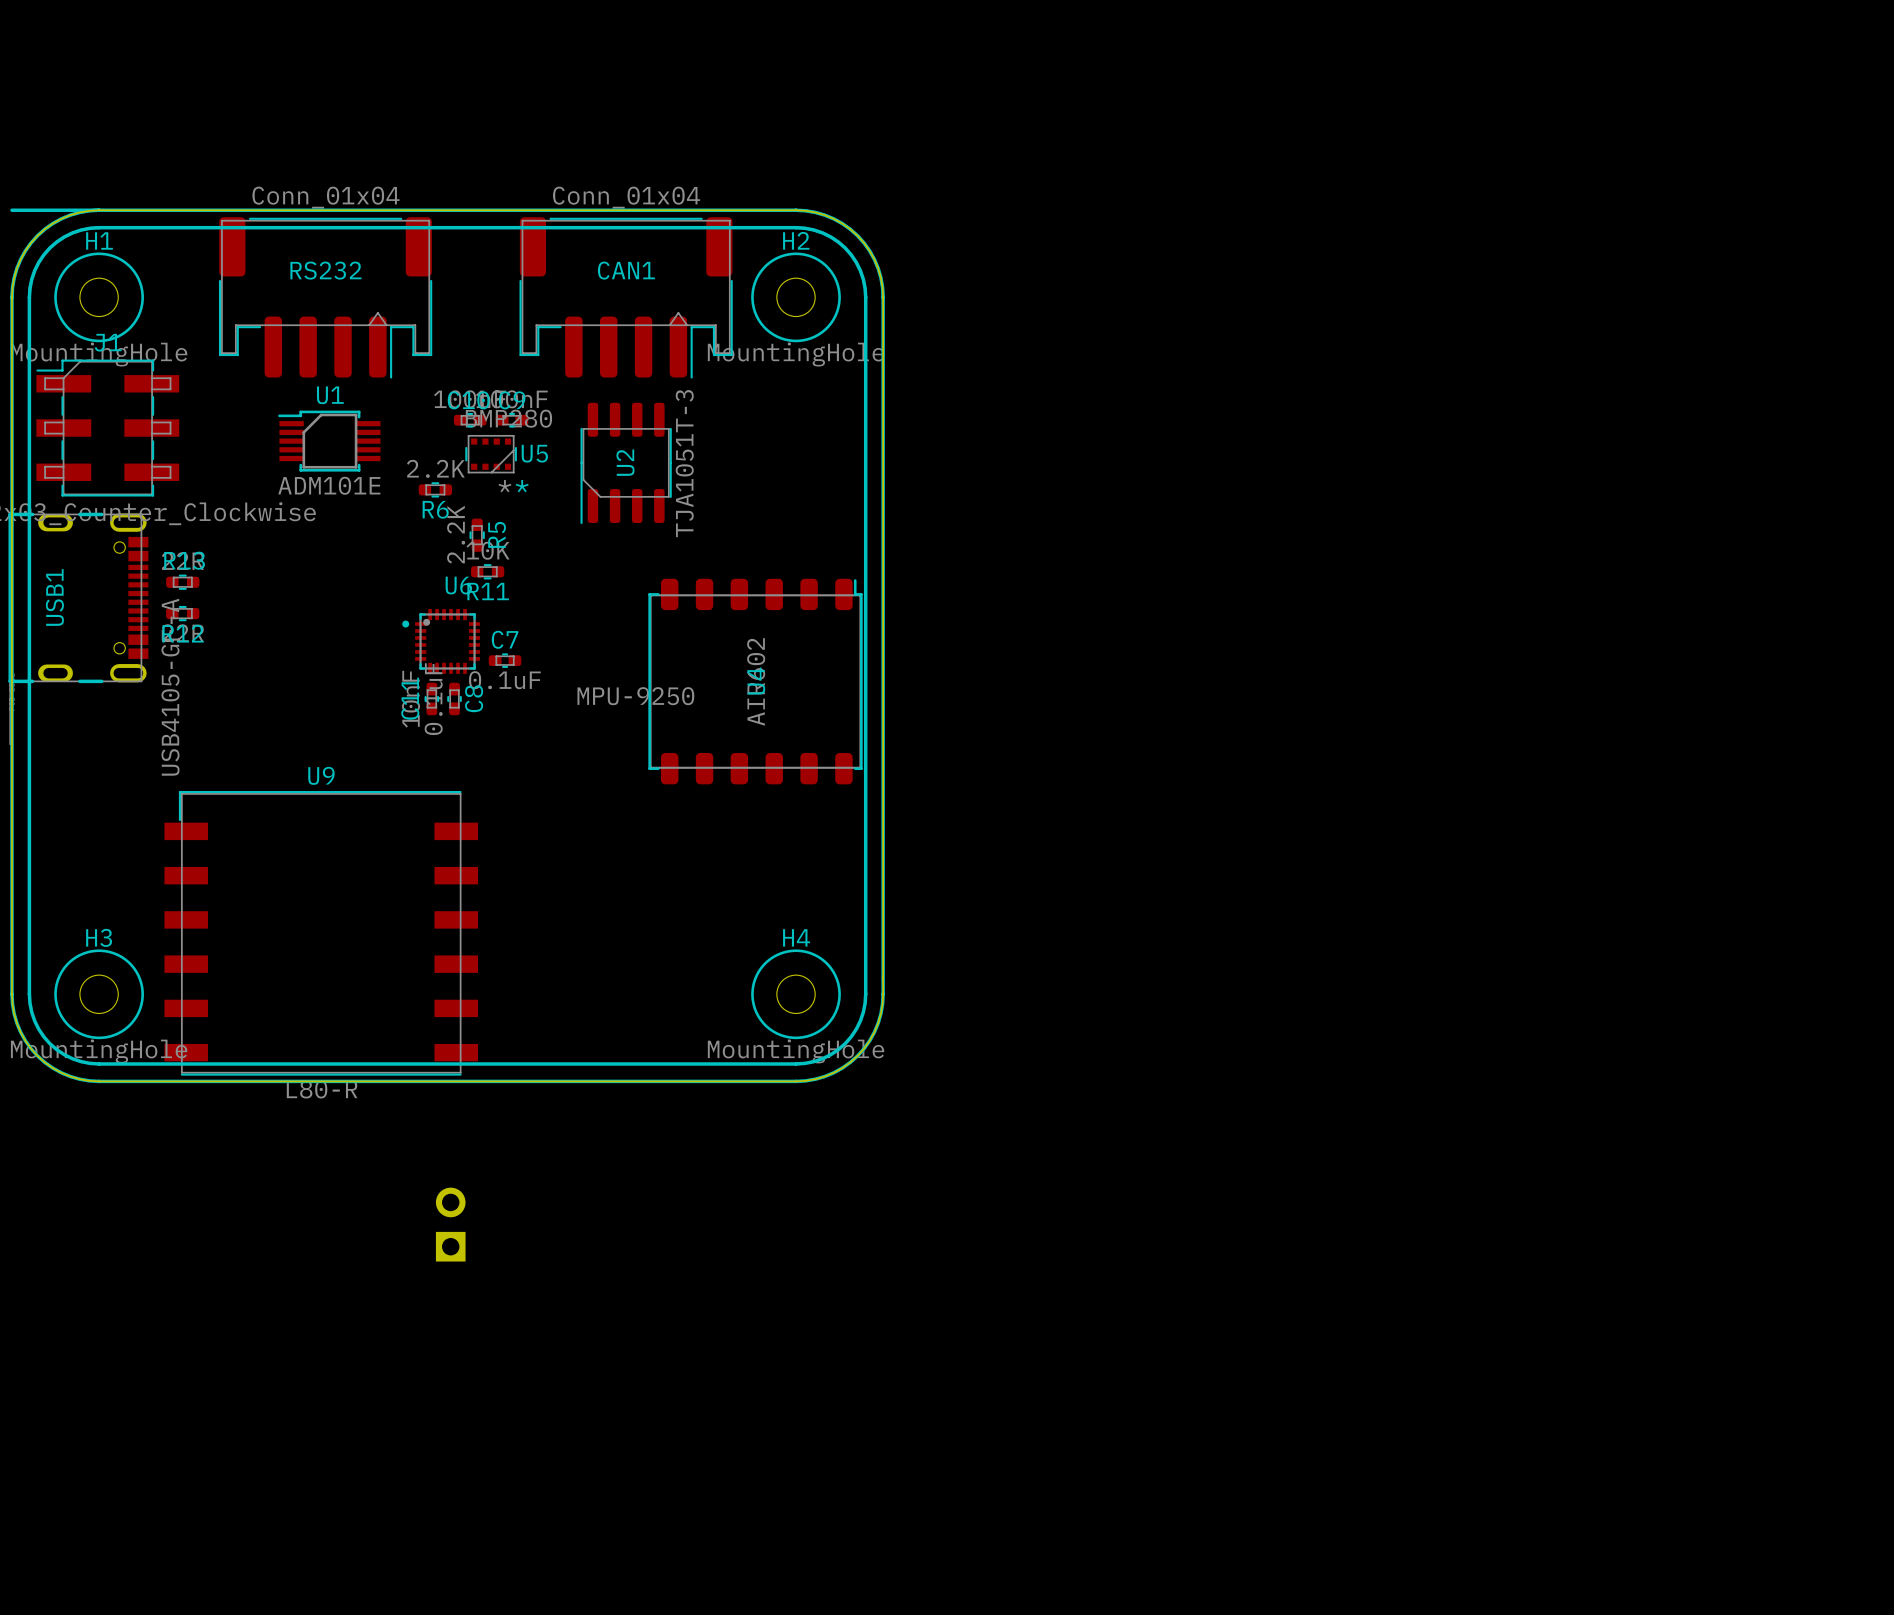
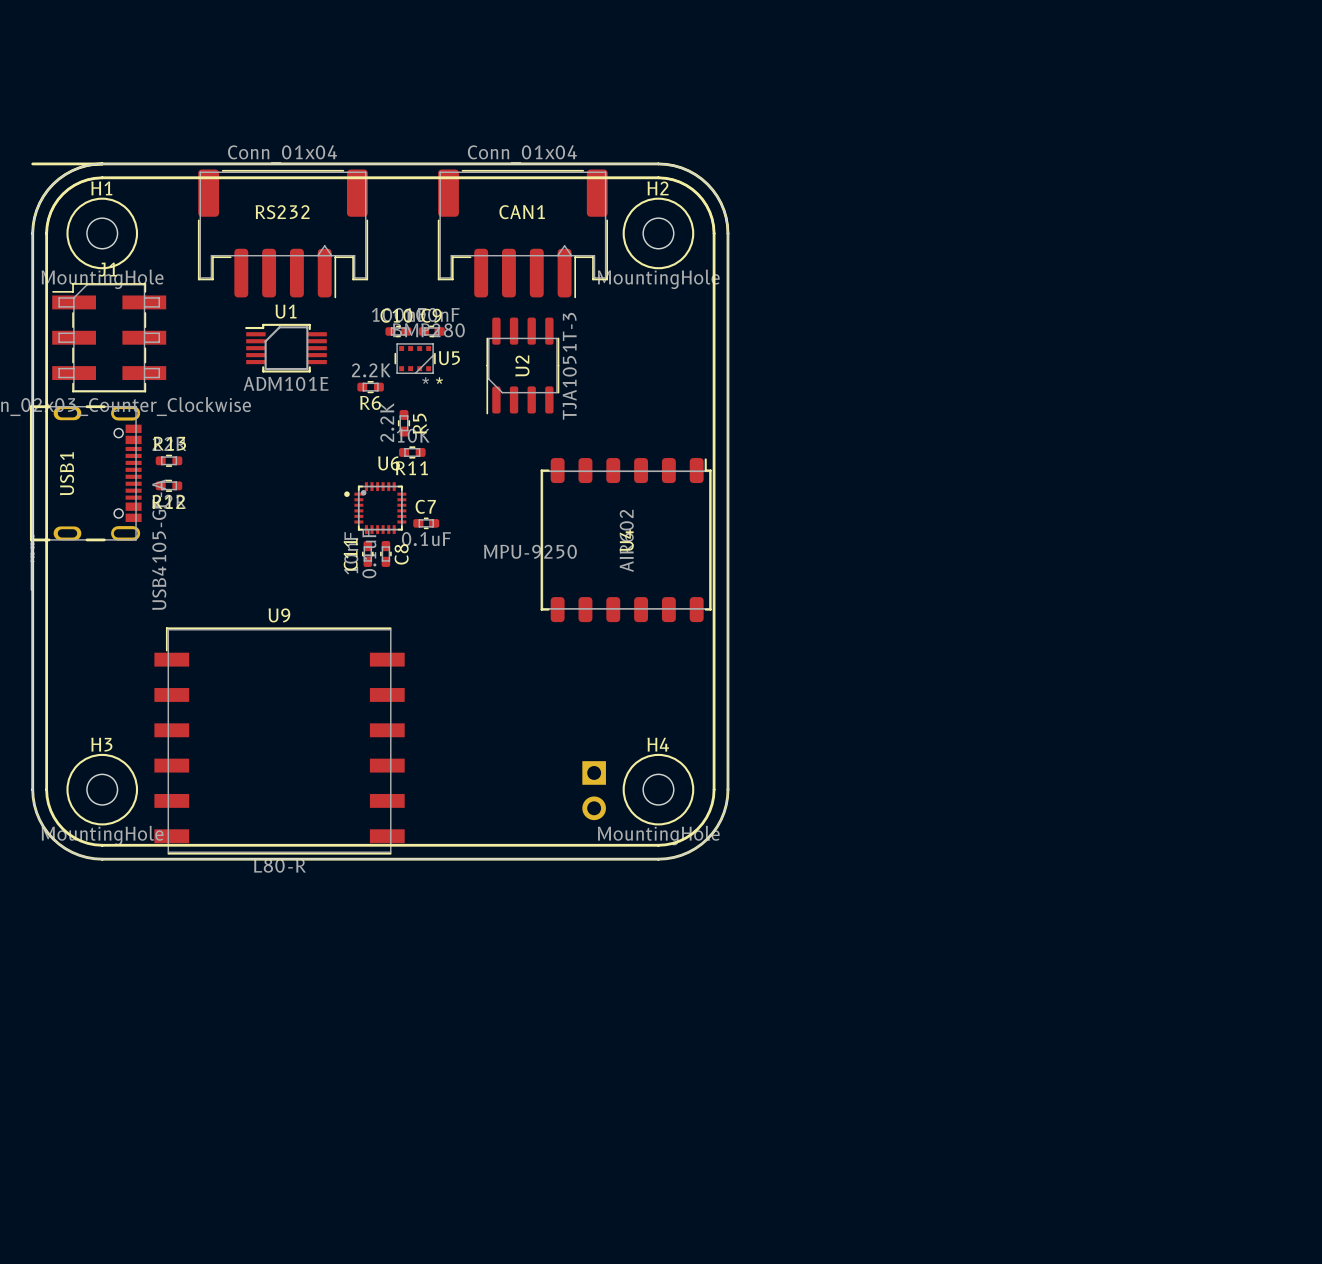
part rotation: 0° (450, 1224) -> 180° (594, 790)
part position: (450, 1224) -> (594, 790)

